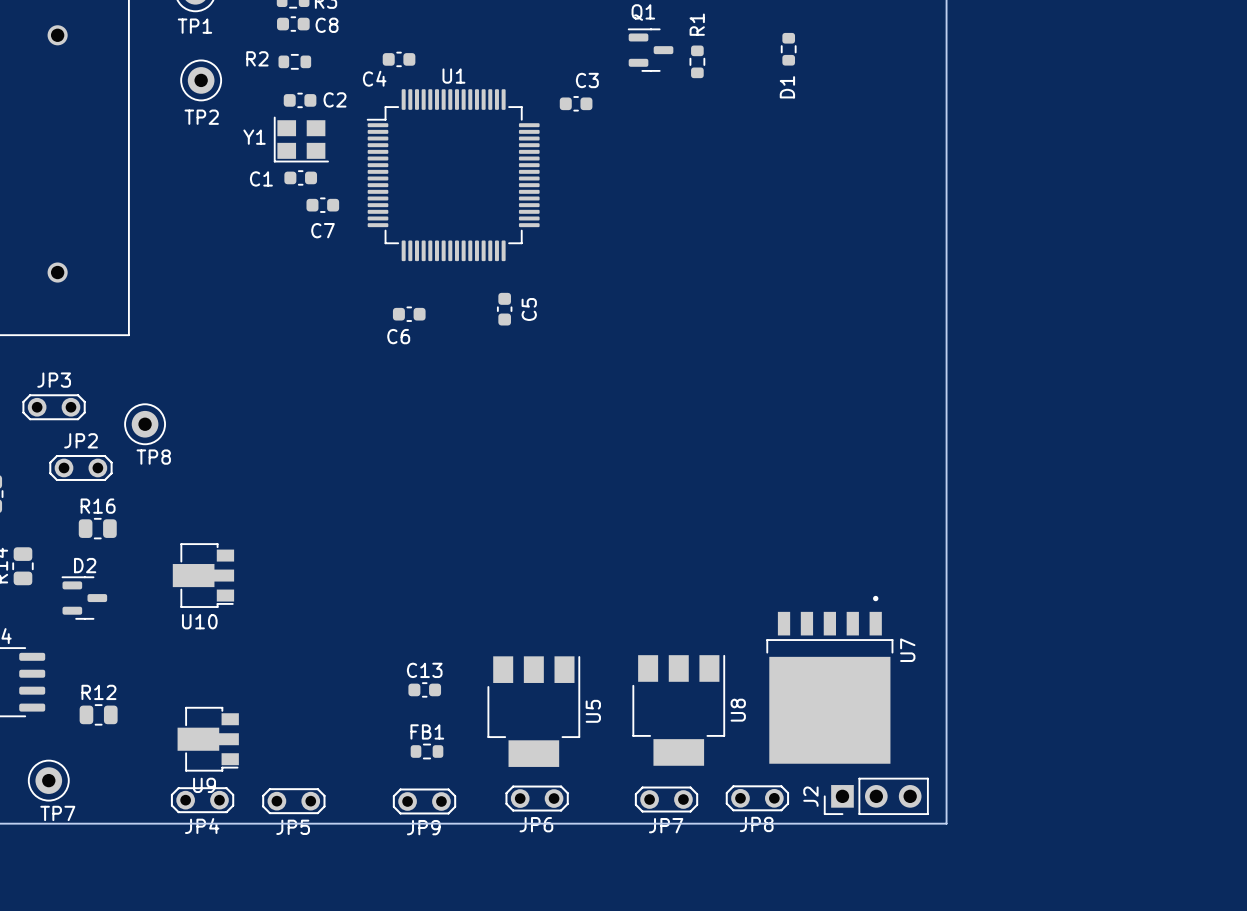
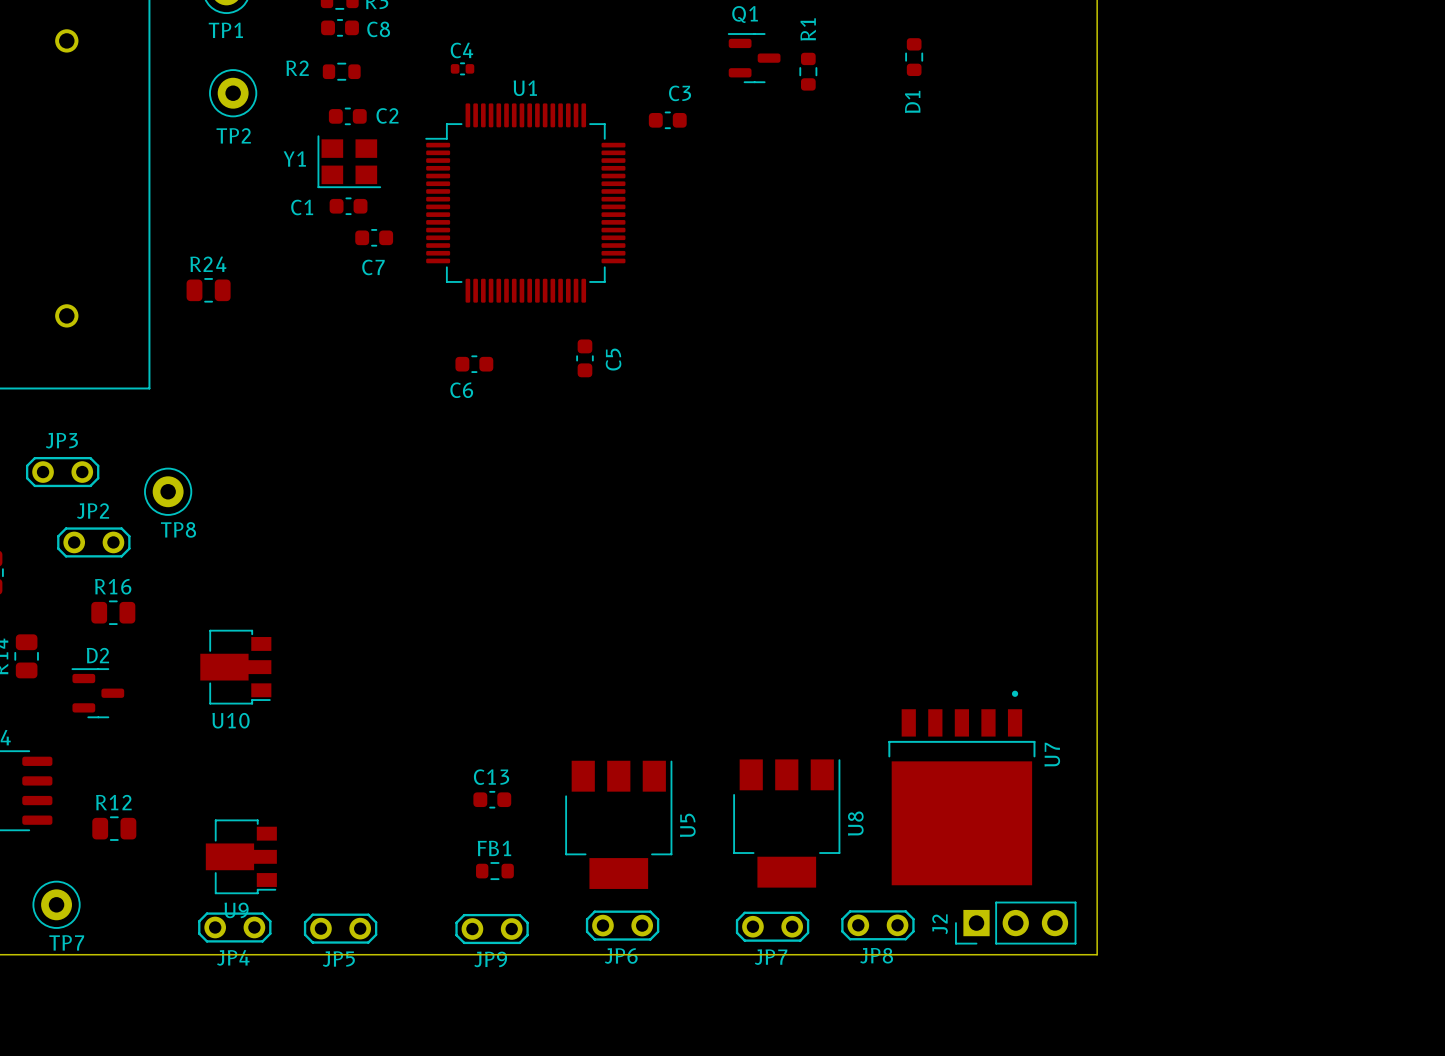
C4 footprint: [382, 51, 416, 68] -> [450, 62, 475, 76]
C4 name position: C4 (374, 78) -> C4 (461, 50)
R24: none -> (208, 290)

